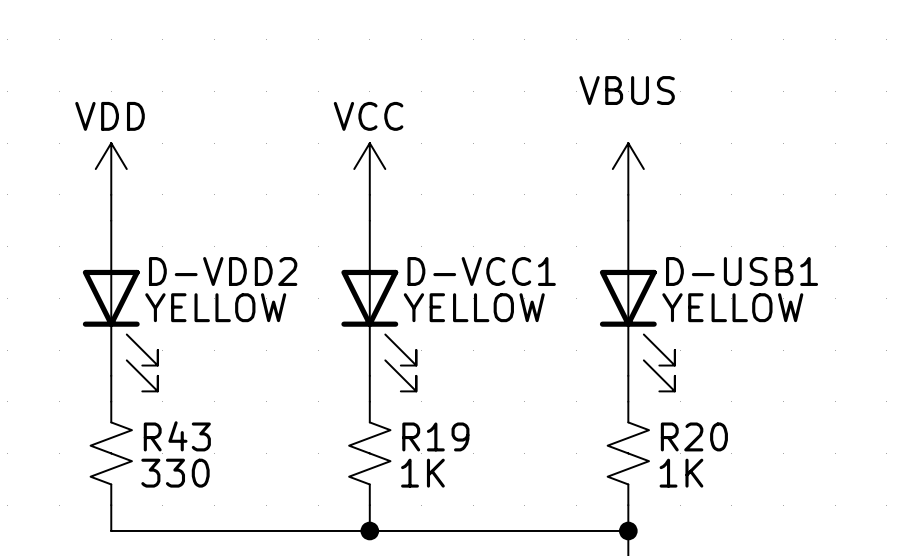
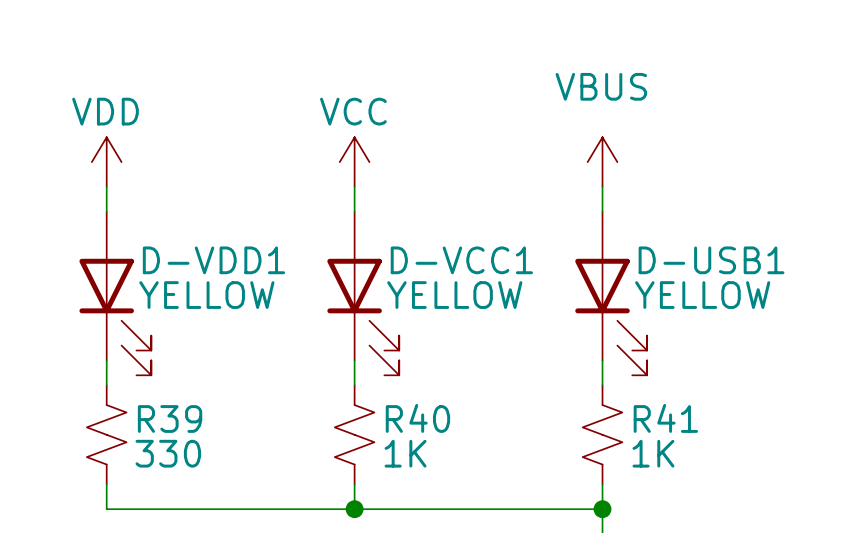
D-VDD2 name: D-VDD2 (223, 271) -> D-VDD1 (213, 260)
R43 name: R43 (177, 436) -> R39 (170, 419)
R19 name: R19 (435, 436) -> R40 (417, 418)
R20 name: R20 (694, 436) -> R41 (665, 418)

